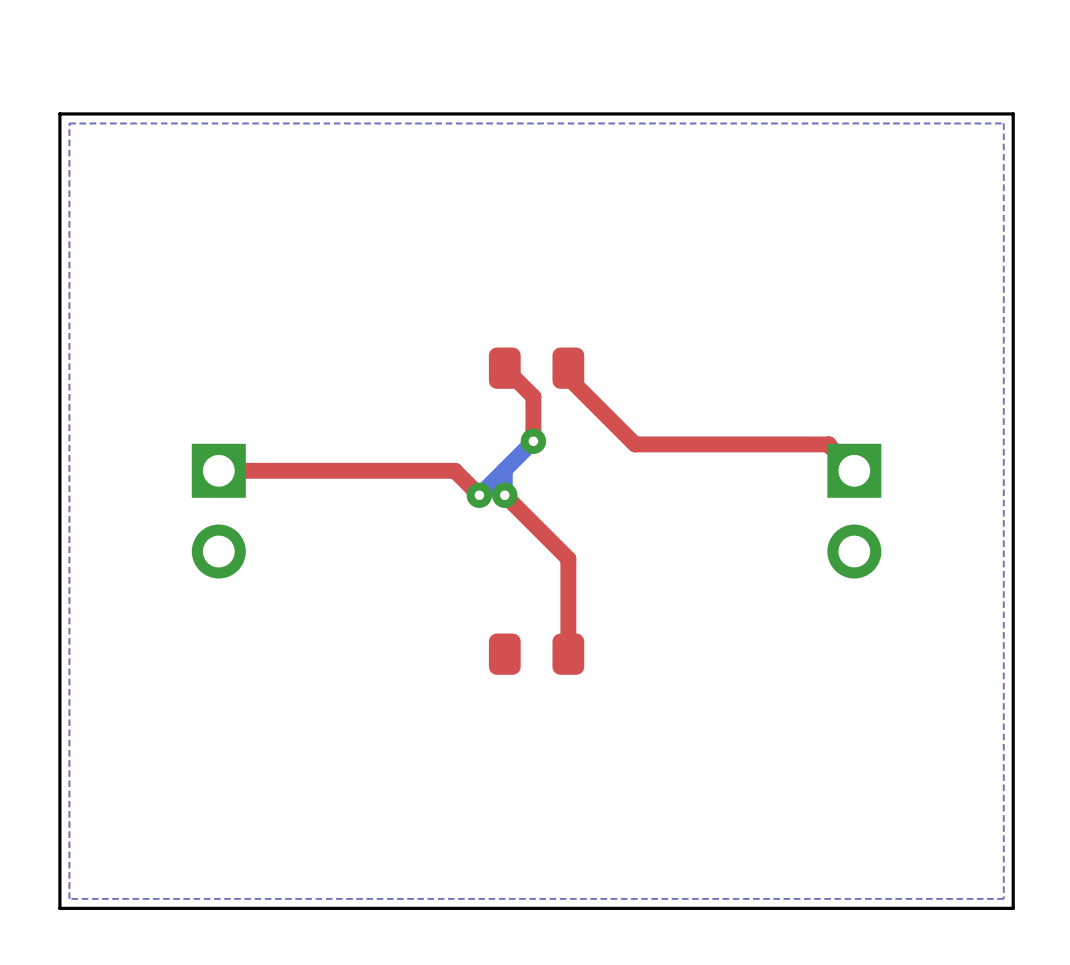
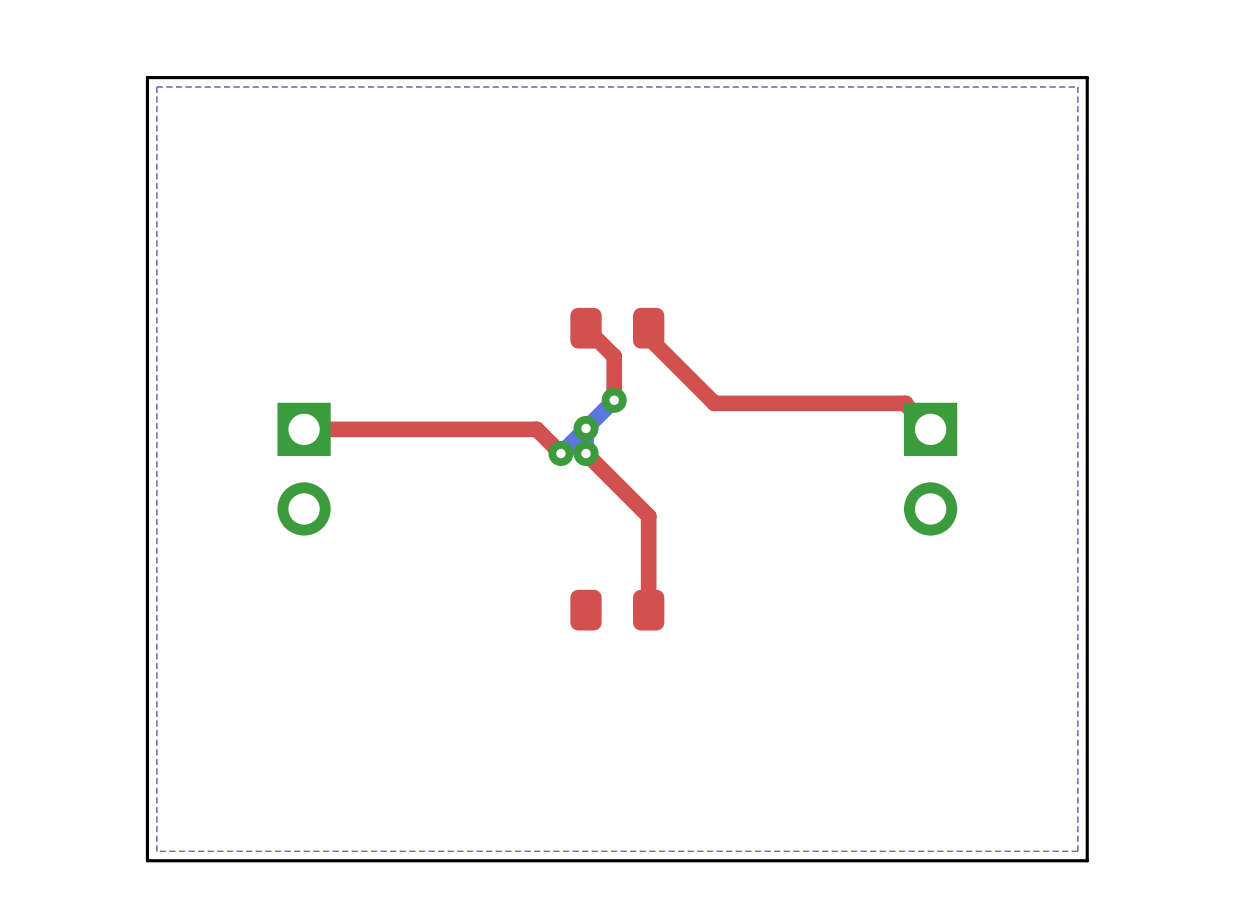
via: none -> (586, 428)

